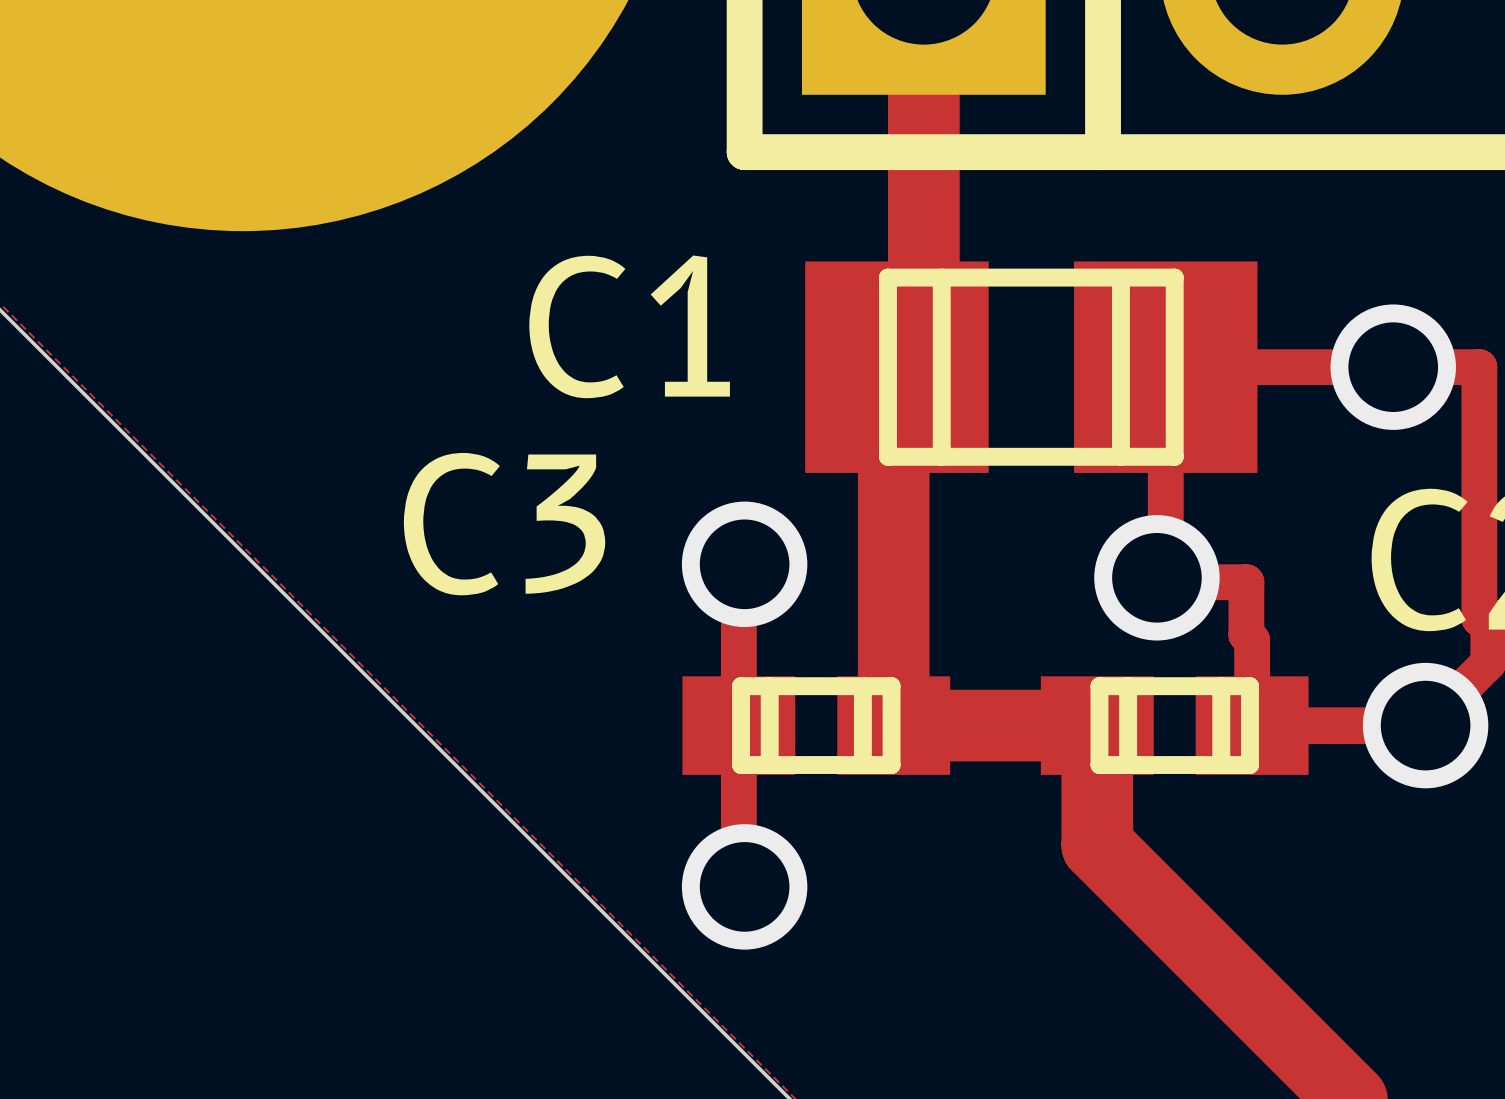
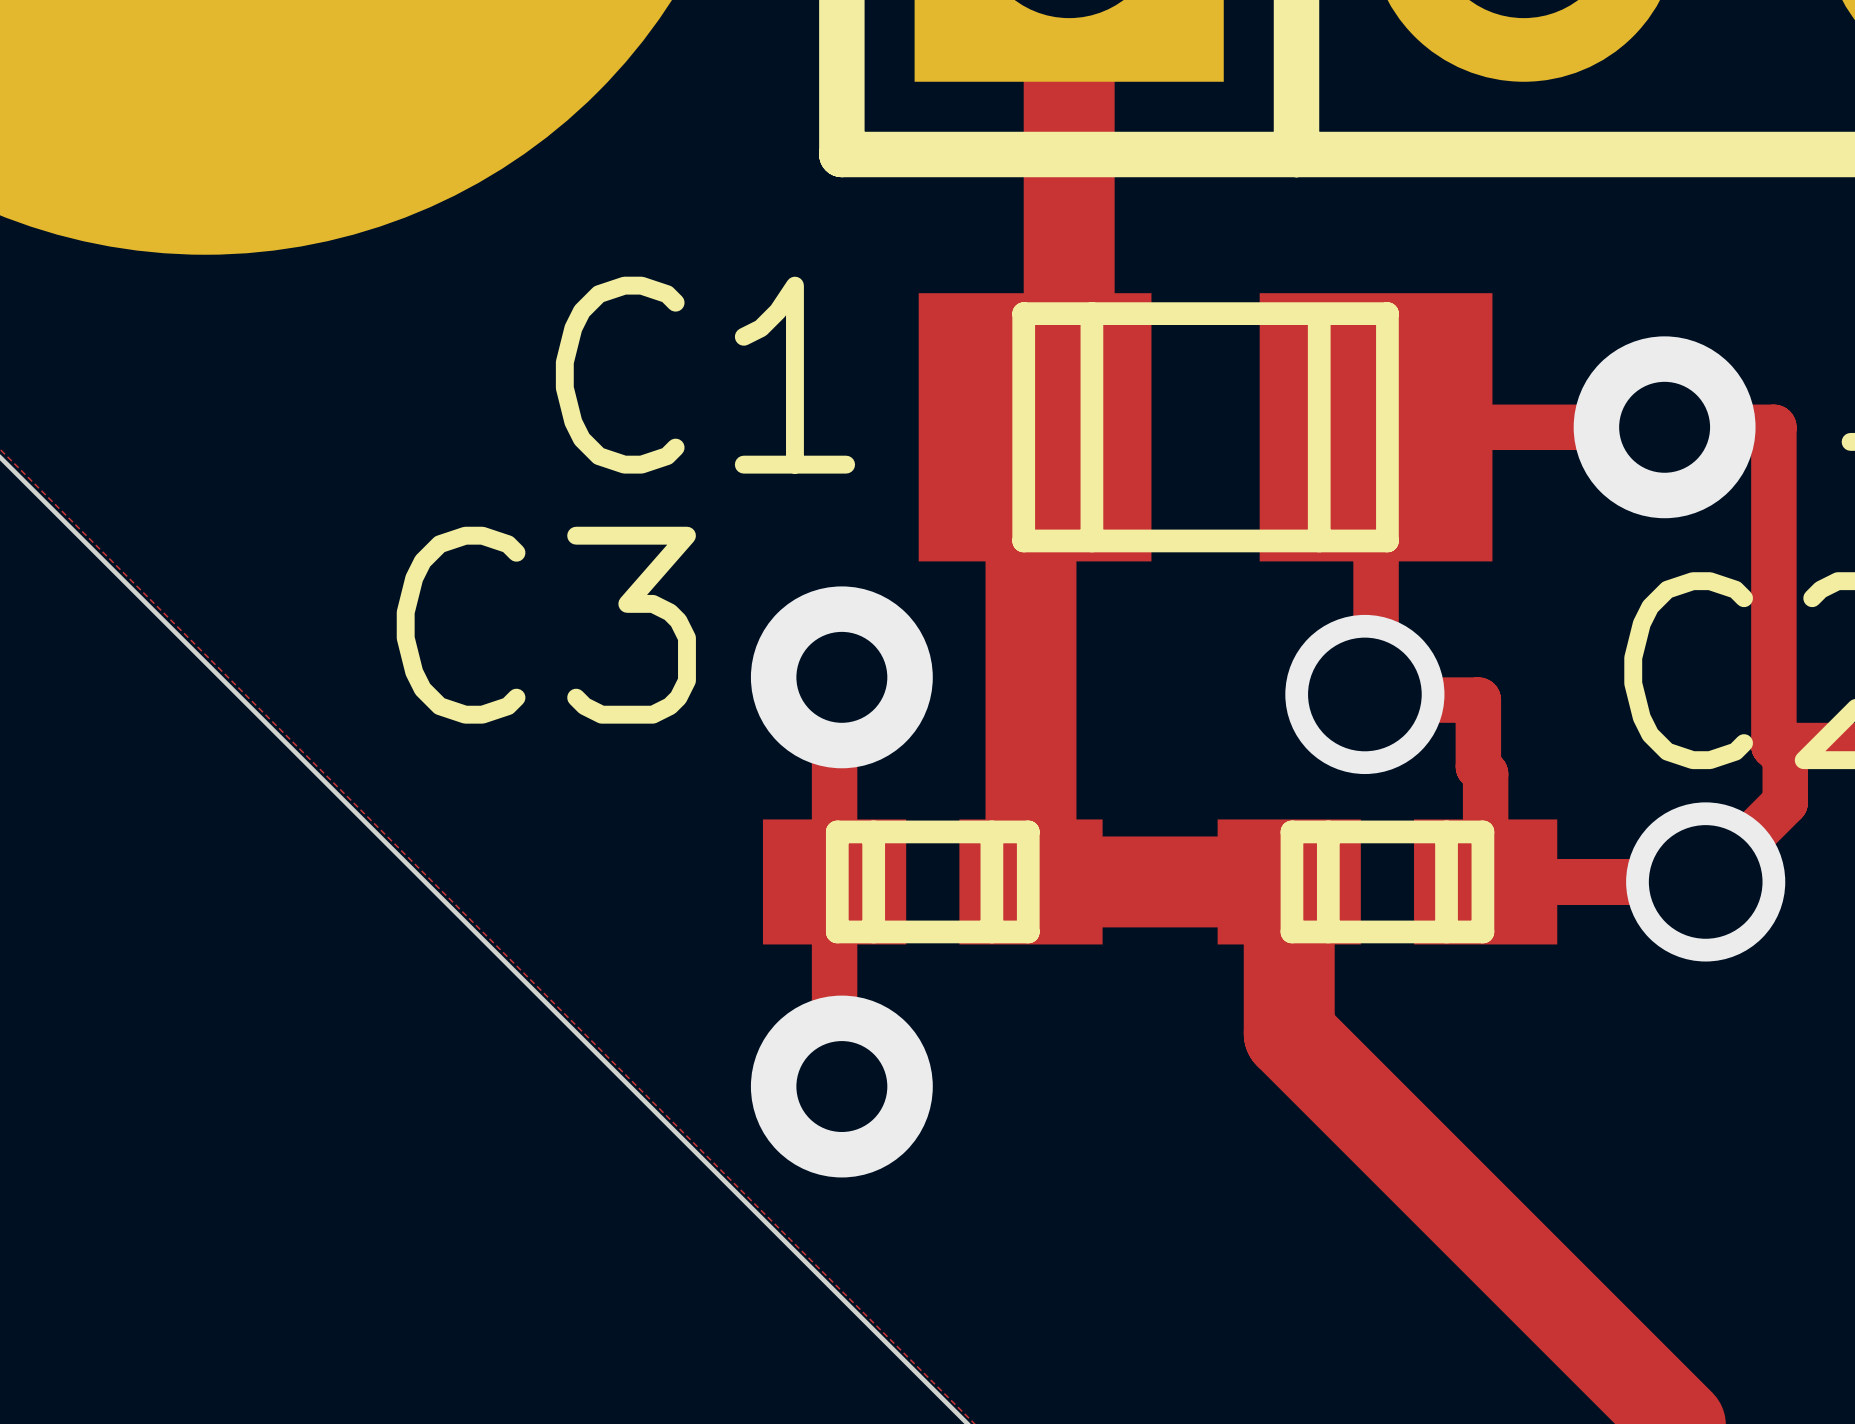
via size: [1330, 304, 1456, 430] -> [1573, 336, 1756, 519]
via size: [681, 501, 808, 628] -> [750, 586, 933, 769]
via size: [681, 824, 808, 950] -> [750, 995, 933, 1178]

